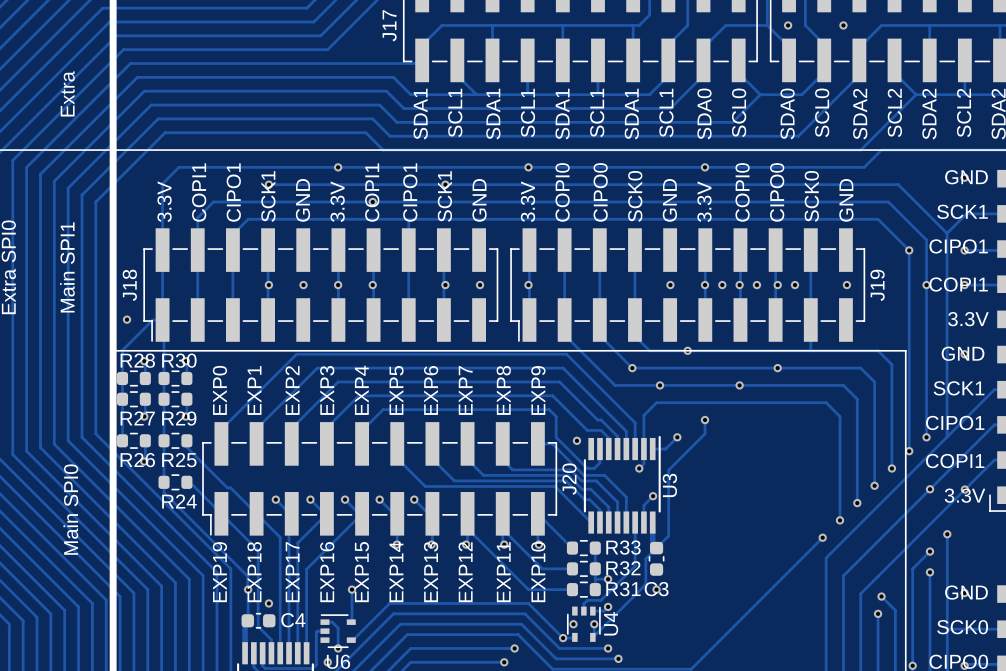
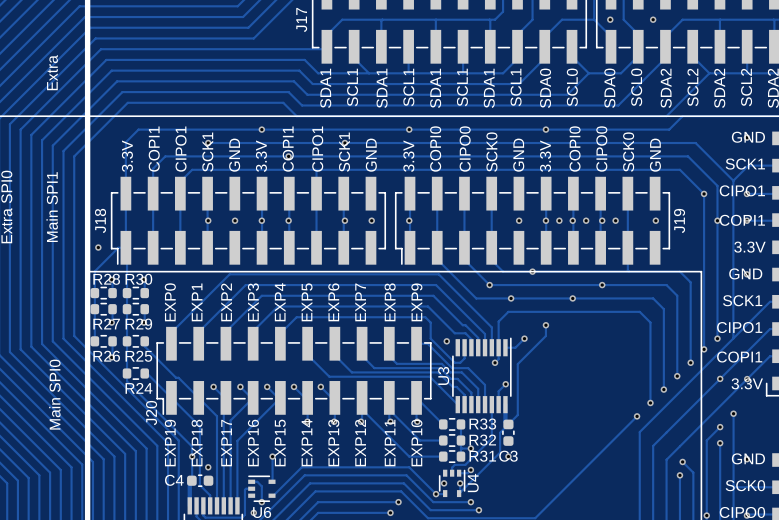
J20 name position: J20 (569, 479) -> J20 (151, 413)
U3 name position: U3 (669, 485) -> U3 (443, 375)
C4 name position: C4 (293, 620) -> C4 (174, 480)

